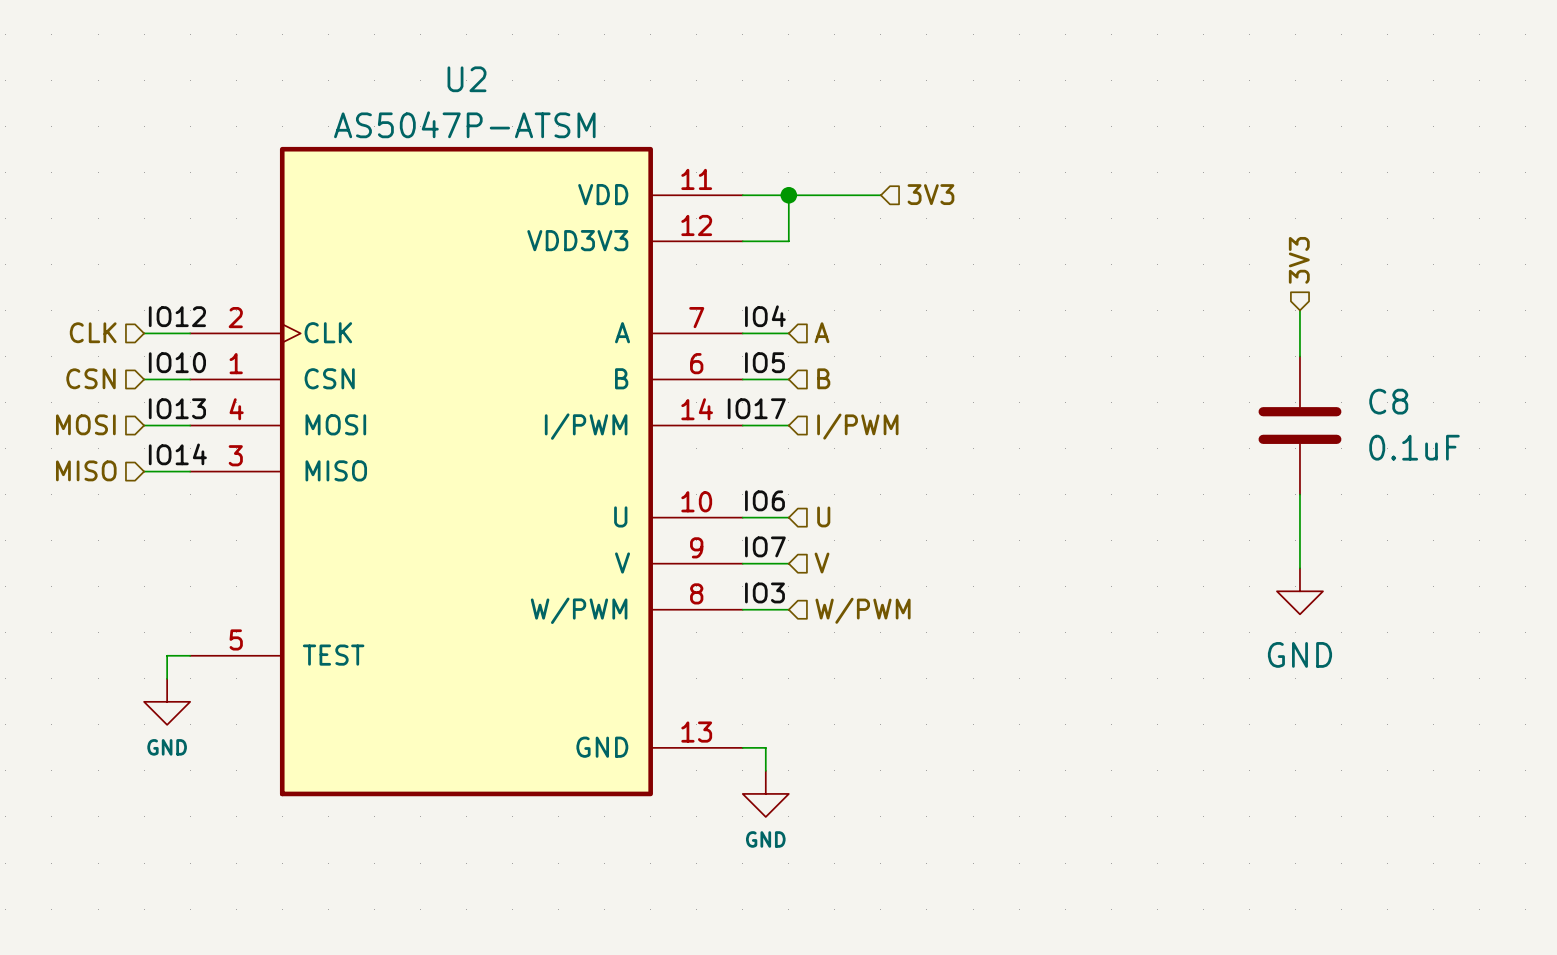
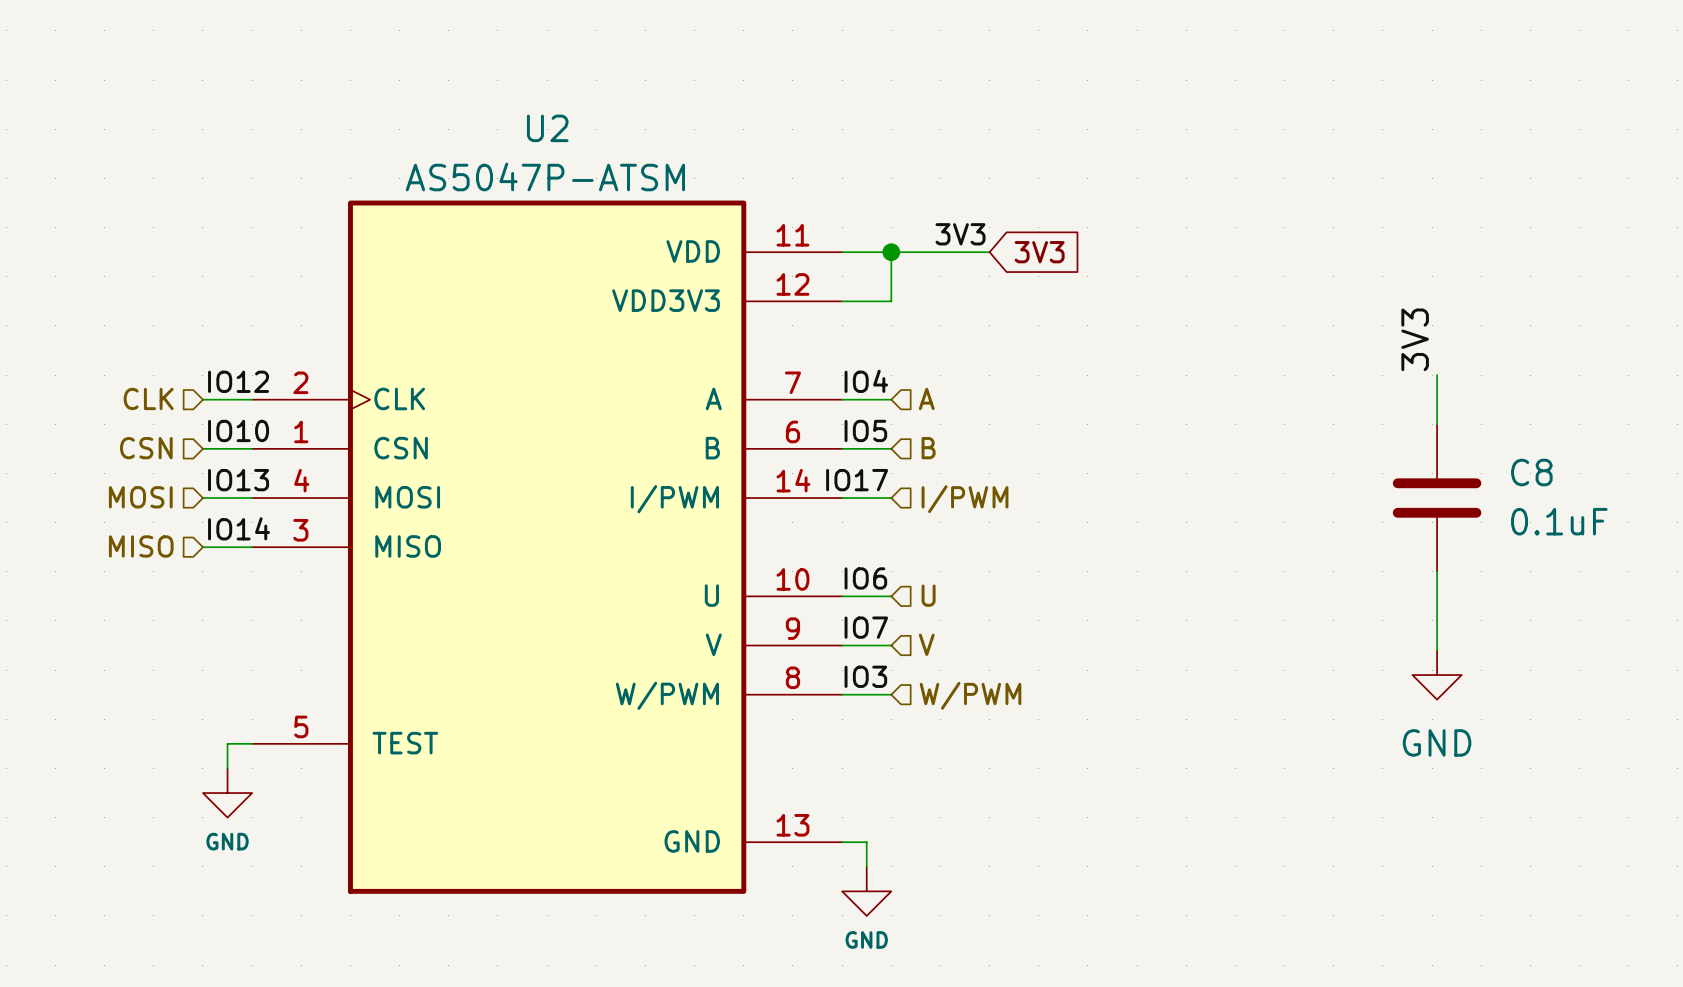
label: none -> 3V3 (960, 234)
hierarchical label: 3V3 (930, 194) -> none
global label: none -> 3V3 (1039, 252)
hierarchical label: 3V3 (1299, 260) -> none
label: none -> 3V3 (1415, 339)

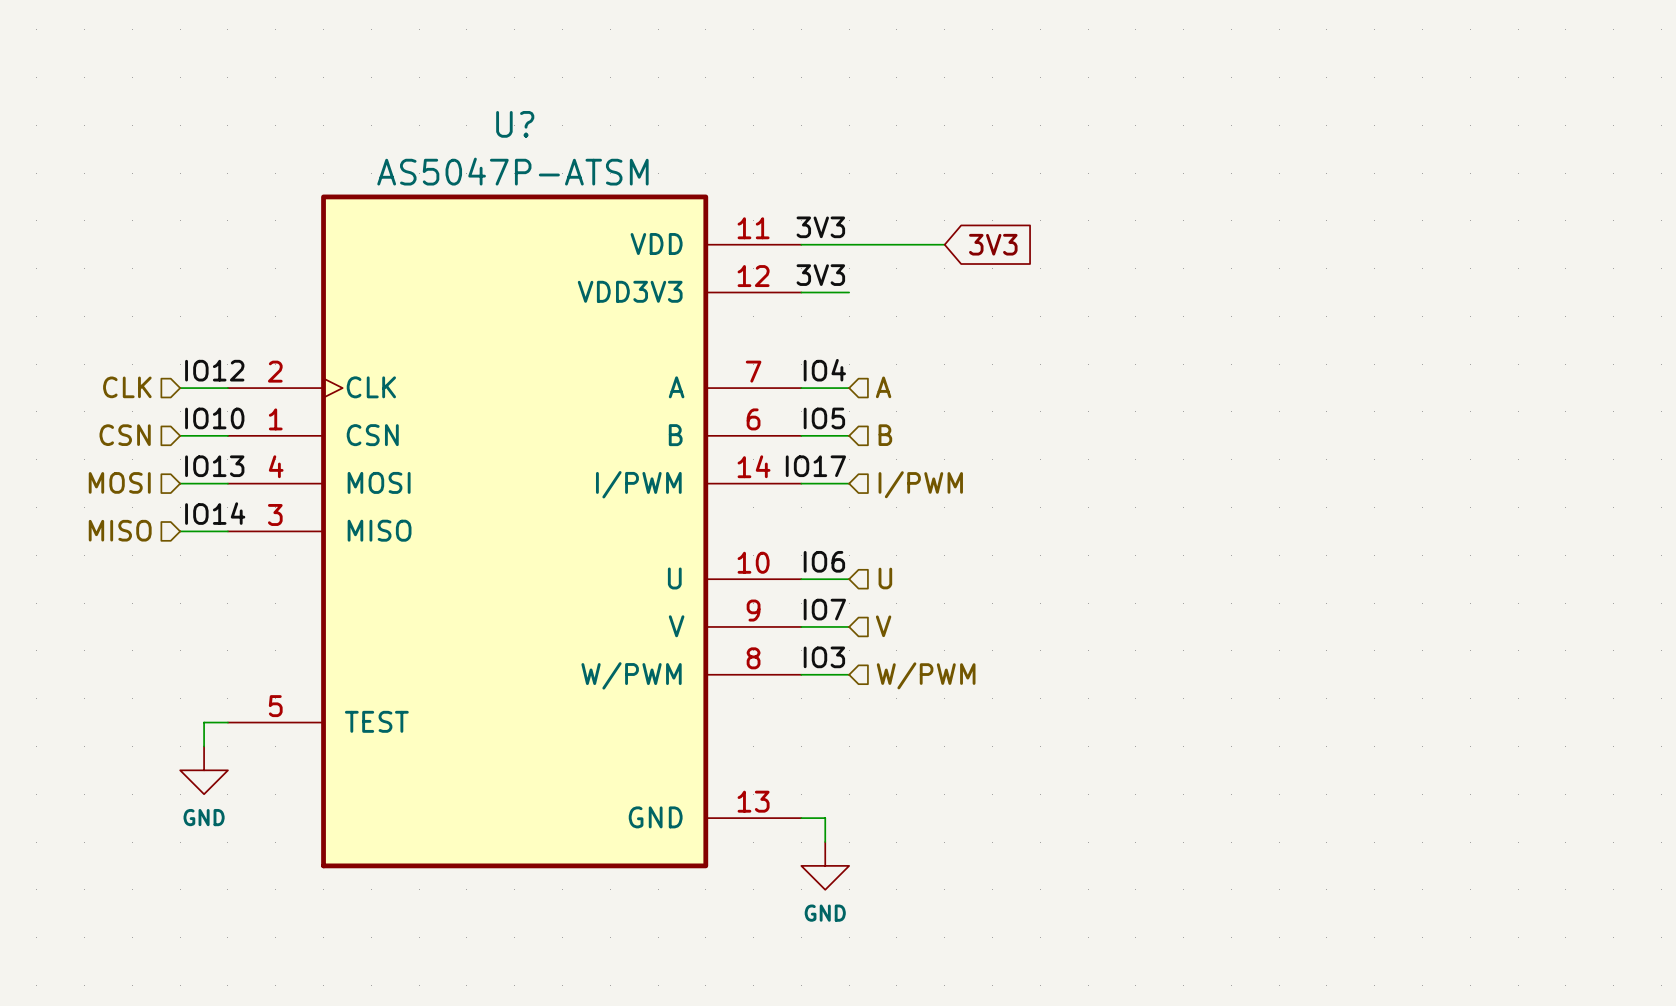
U2 name: U2 (547, 128) -> U? (515, 124)
label: none -> 3V3 (820, 227)
label: 3V3 (960, 234) -> none
wire: (891, 252) (891, 301) -> none
junction: (891, 252) -> none
label: none -> 3V3 (820, 275)
label: 3V3 (1415, 339) -> none
wire: (1437, 375) (1437, 424) -> none
C8: 0.1uF (1437, 498) -> none
wire: (1437, 571) (1437, 650) -> none
power symbol: GND (1437, 675) -> none

